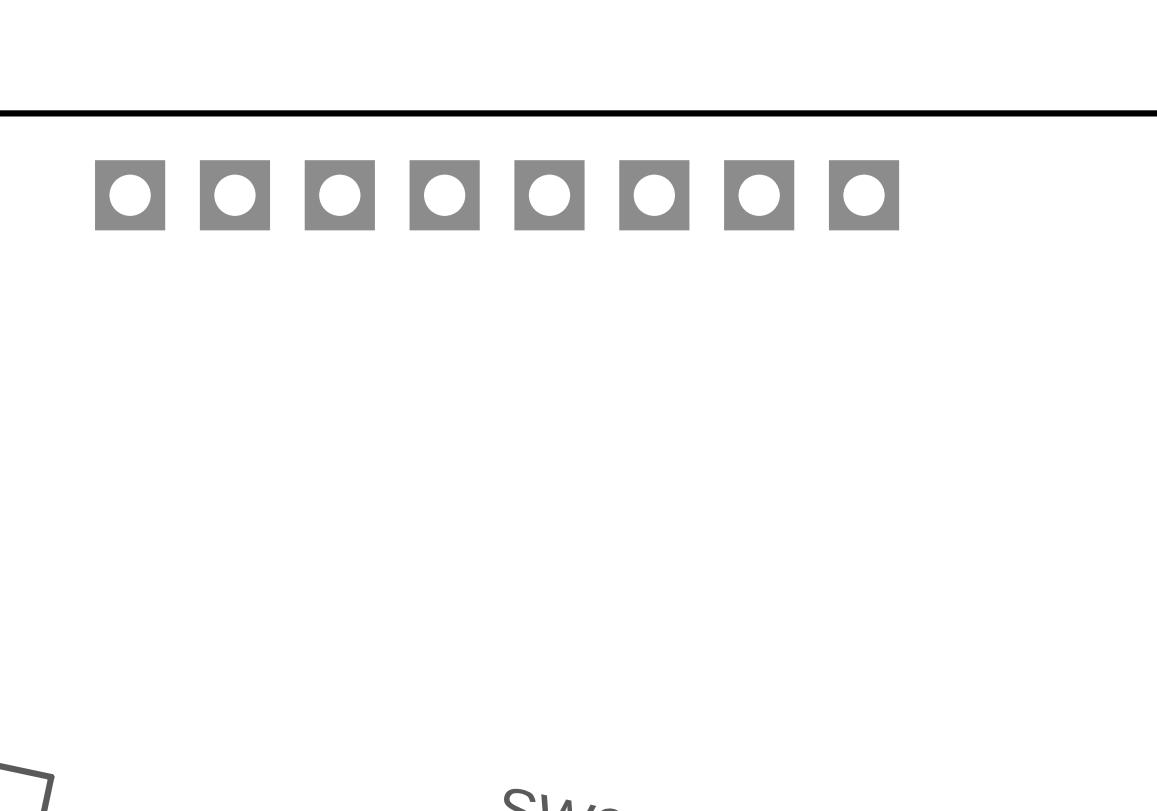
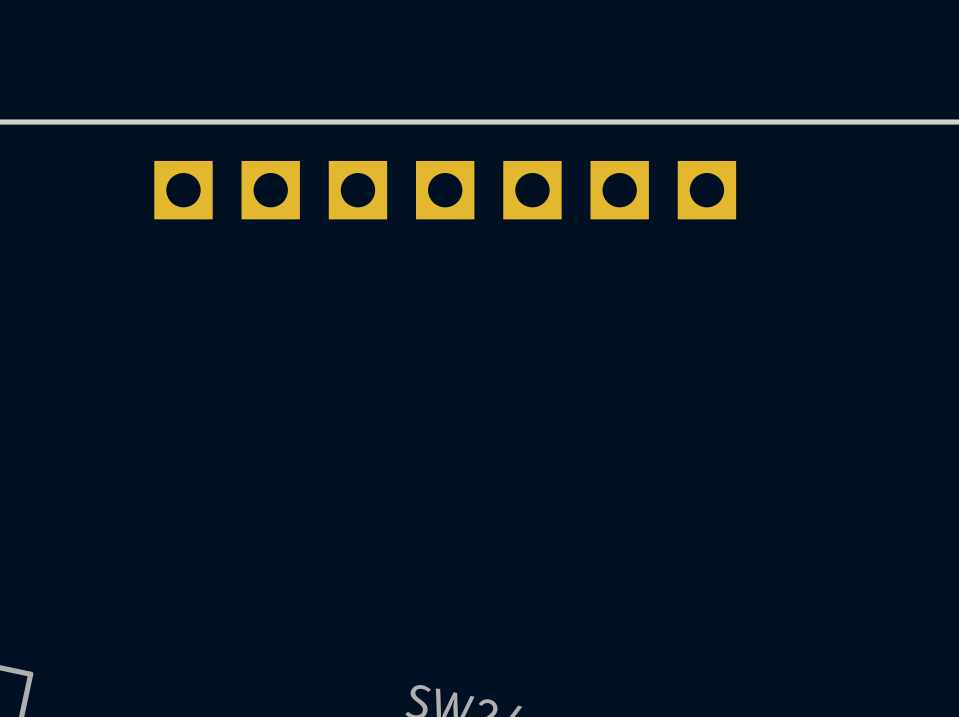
part: (130, 195) -> none

